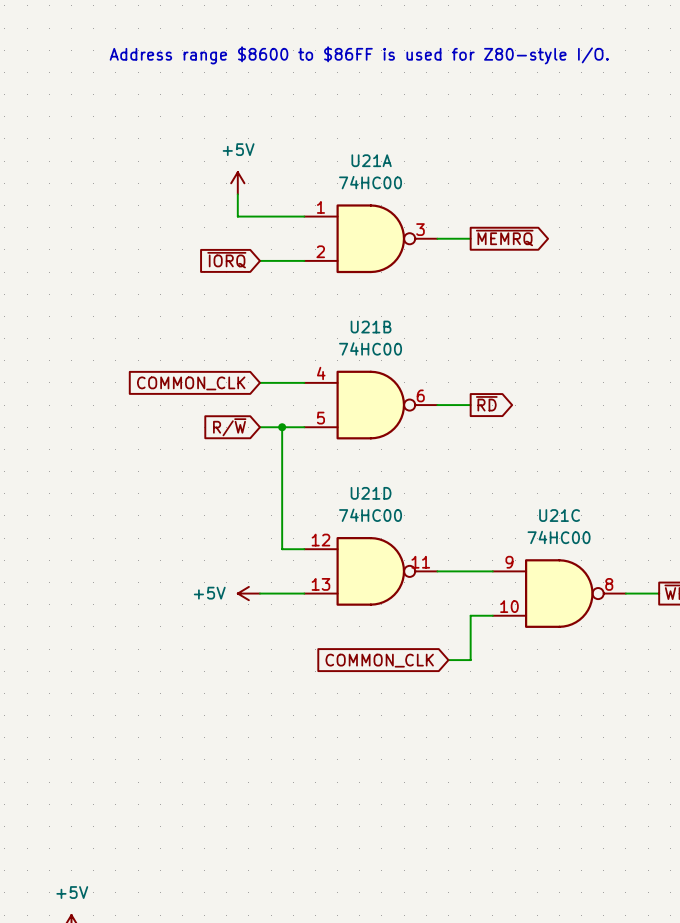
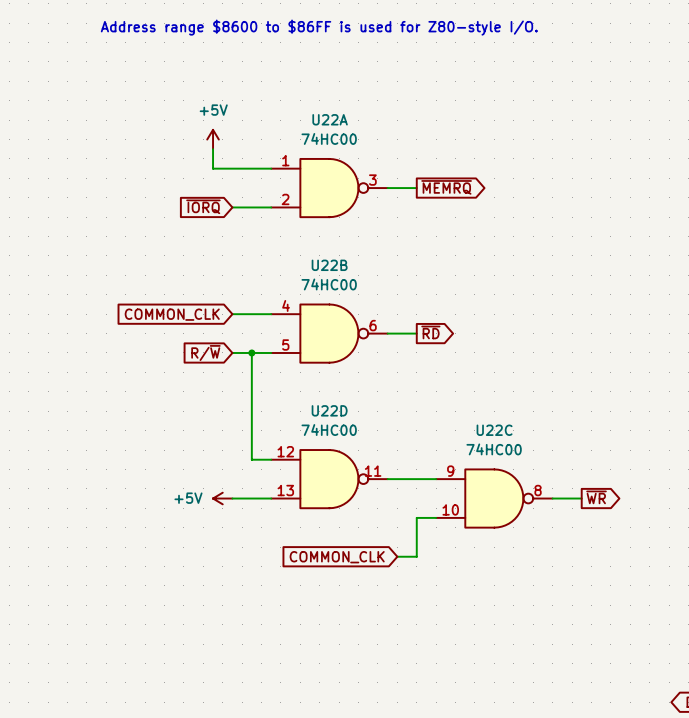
U21A name: U21A (371, 160) -> U22A (330, 119)
U21B name: U21B (371, 327) -> U22B (329, 265)
U21D name: U21D (371, 493) -> U22D (329, 410)
U21C name: U21C (559, 515) -> U22C (494, 430)

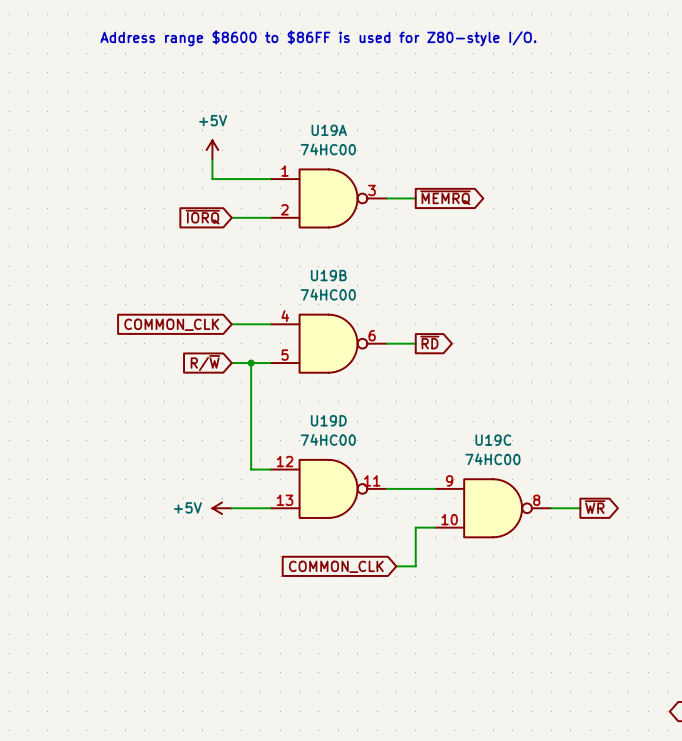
U22A name: U22A (330, 119) -> U19A (329, 130)
U22B name: U22B (329, 265) -> U19B (328, 275)
U22D name: U22D (329, 410) -> U19D (328, 420)
U22C name: U22C (494, 430) -> U19C (493, 440)

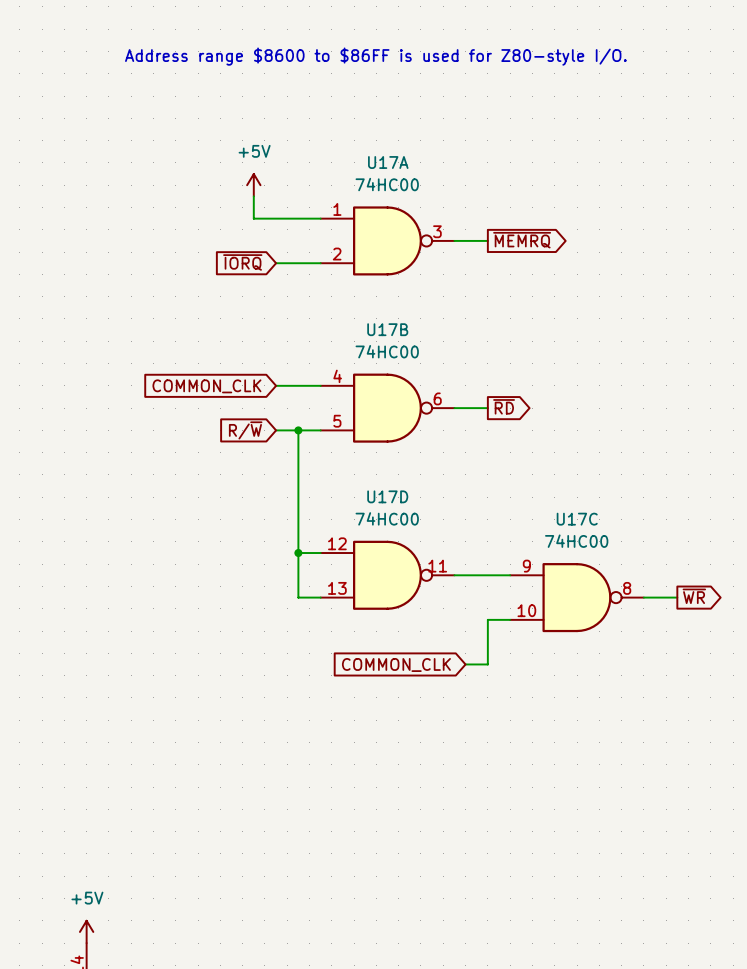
U19A name: U19A (329, 130) -> U17A (388, 162)
U19B name: U19B (328, 275) -> U17B (387, 329)
U19D name: U19D (328, 420) -> U17D (387, 496)
U19C name: U19C (493, 440) -> U17C (577, 519)
junction: none -> (298, 553)
power symbol: +5V (222, 508) -> none
wire: (231, 508) (251, 508) -> (298, 553) (298, 597)

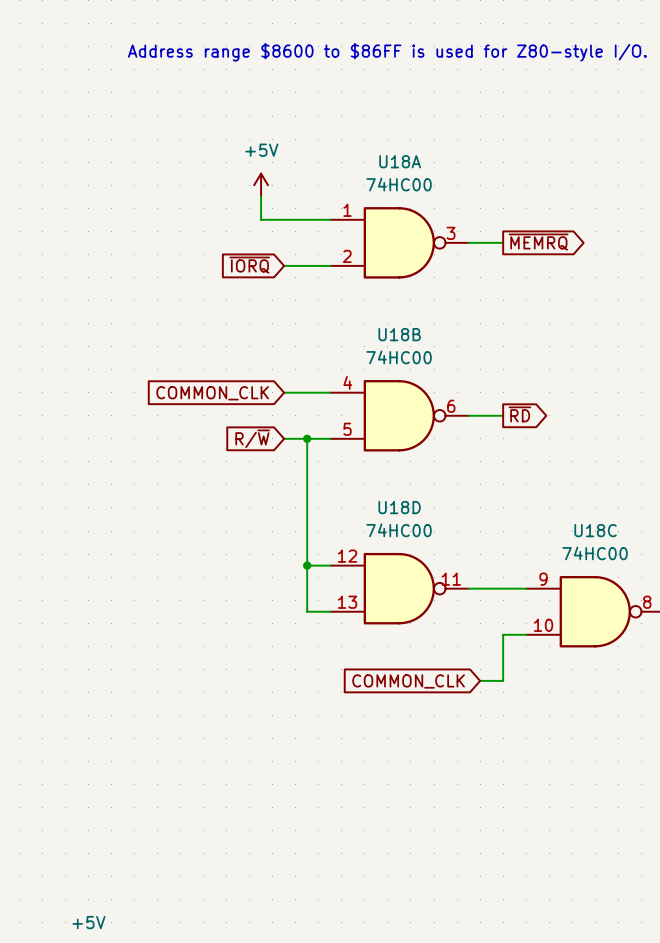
U17A name: U17A (388, 162) -> U18A (400, 161)
U17B name: U17B (387, 329) -> U18B (399, 334)
U17D name: U17D (387, 496) -> U18D (399, 507)
U17C name: U17C (577, 519) -> U18C (595, 530)

